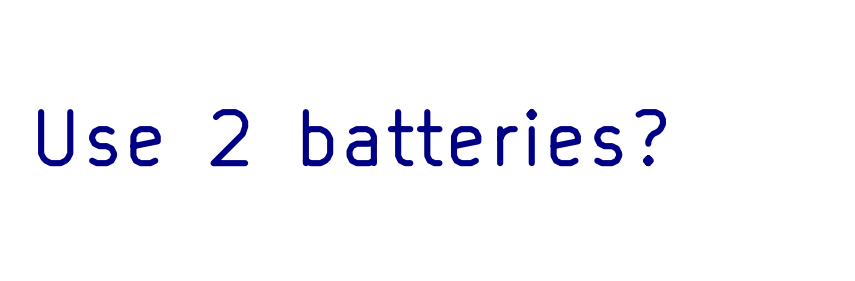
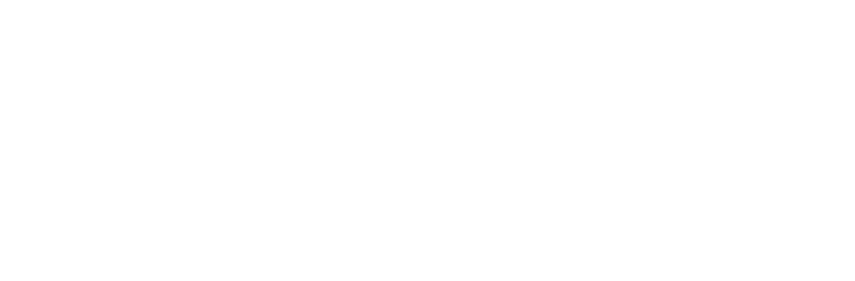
text: Use 2 batteries? (352, 137) -> none

